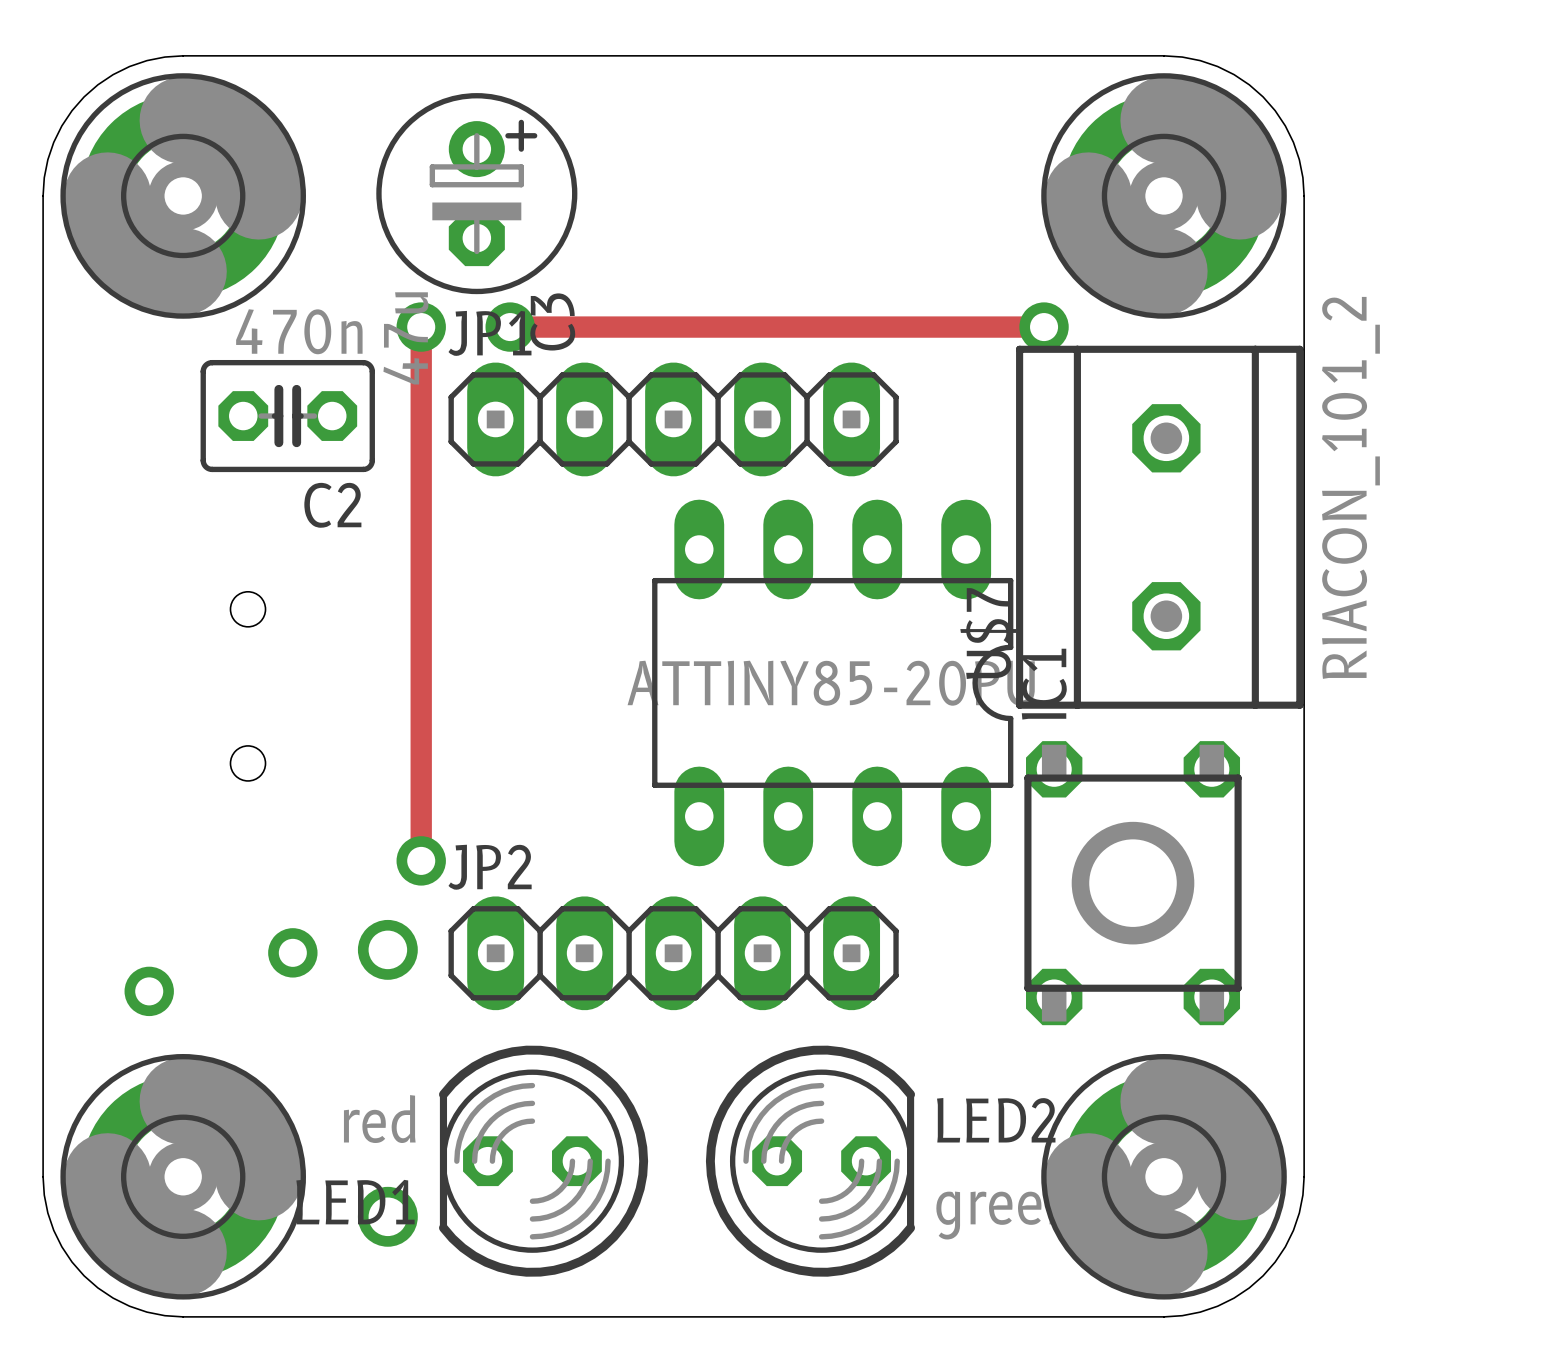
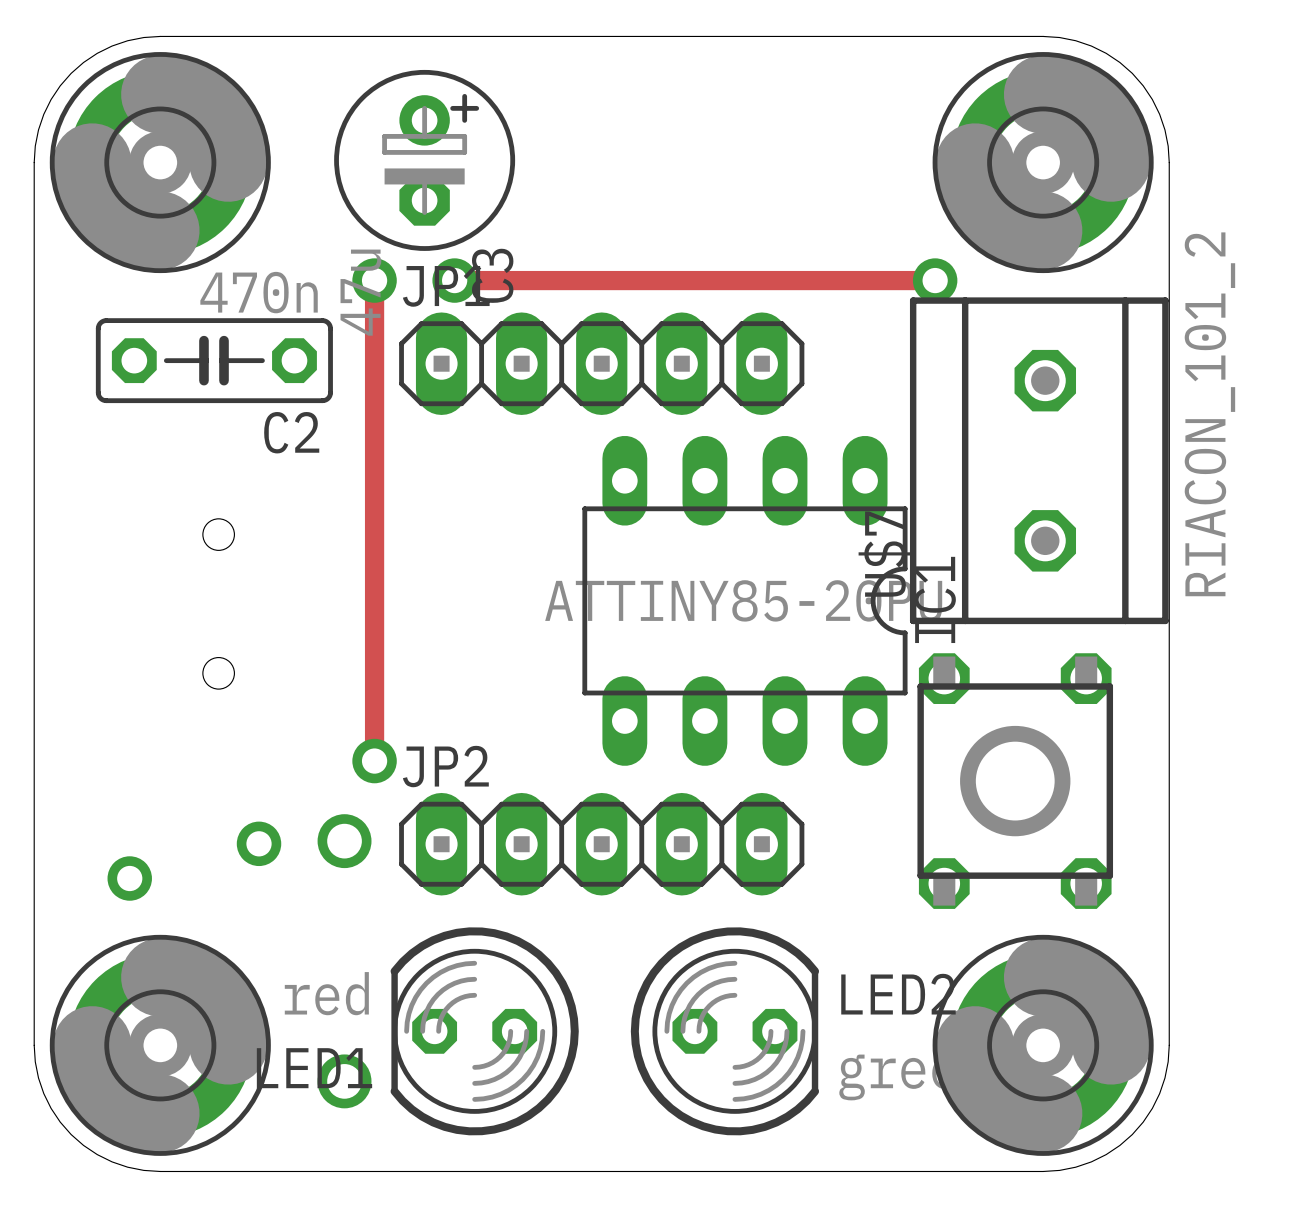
C2 footprint: [200, 359, 375, 473] -> [95, 318, 333, 404]

